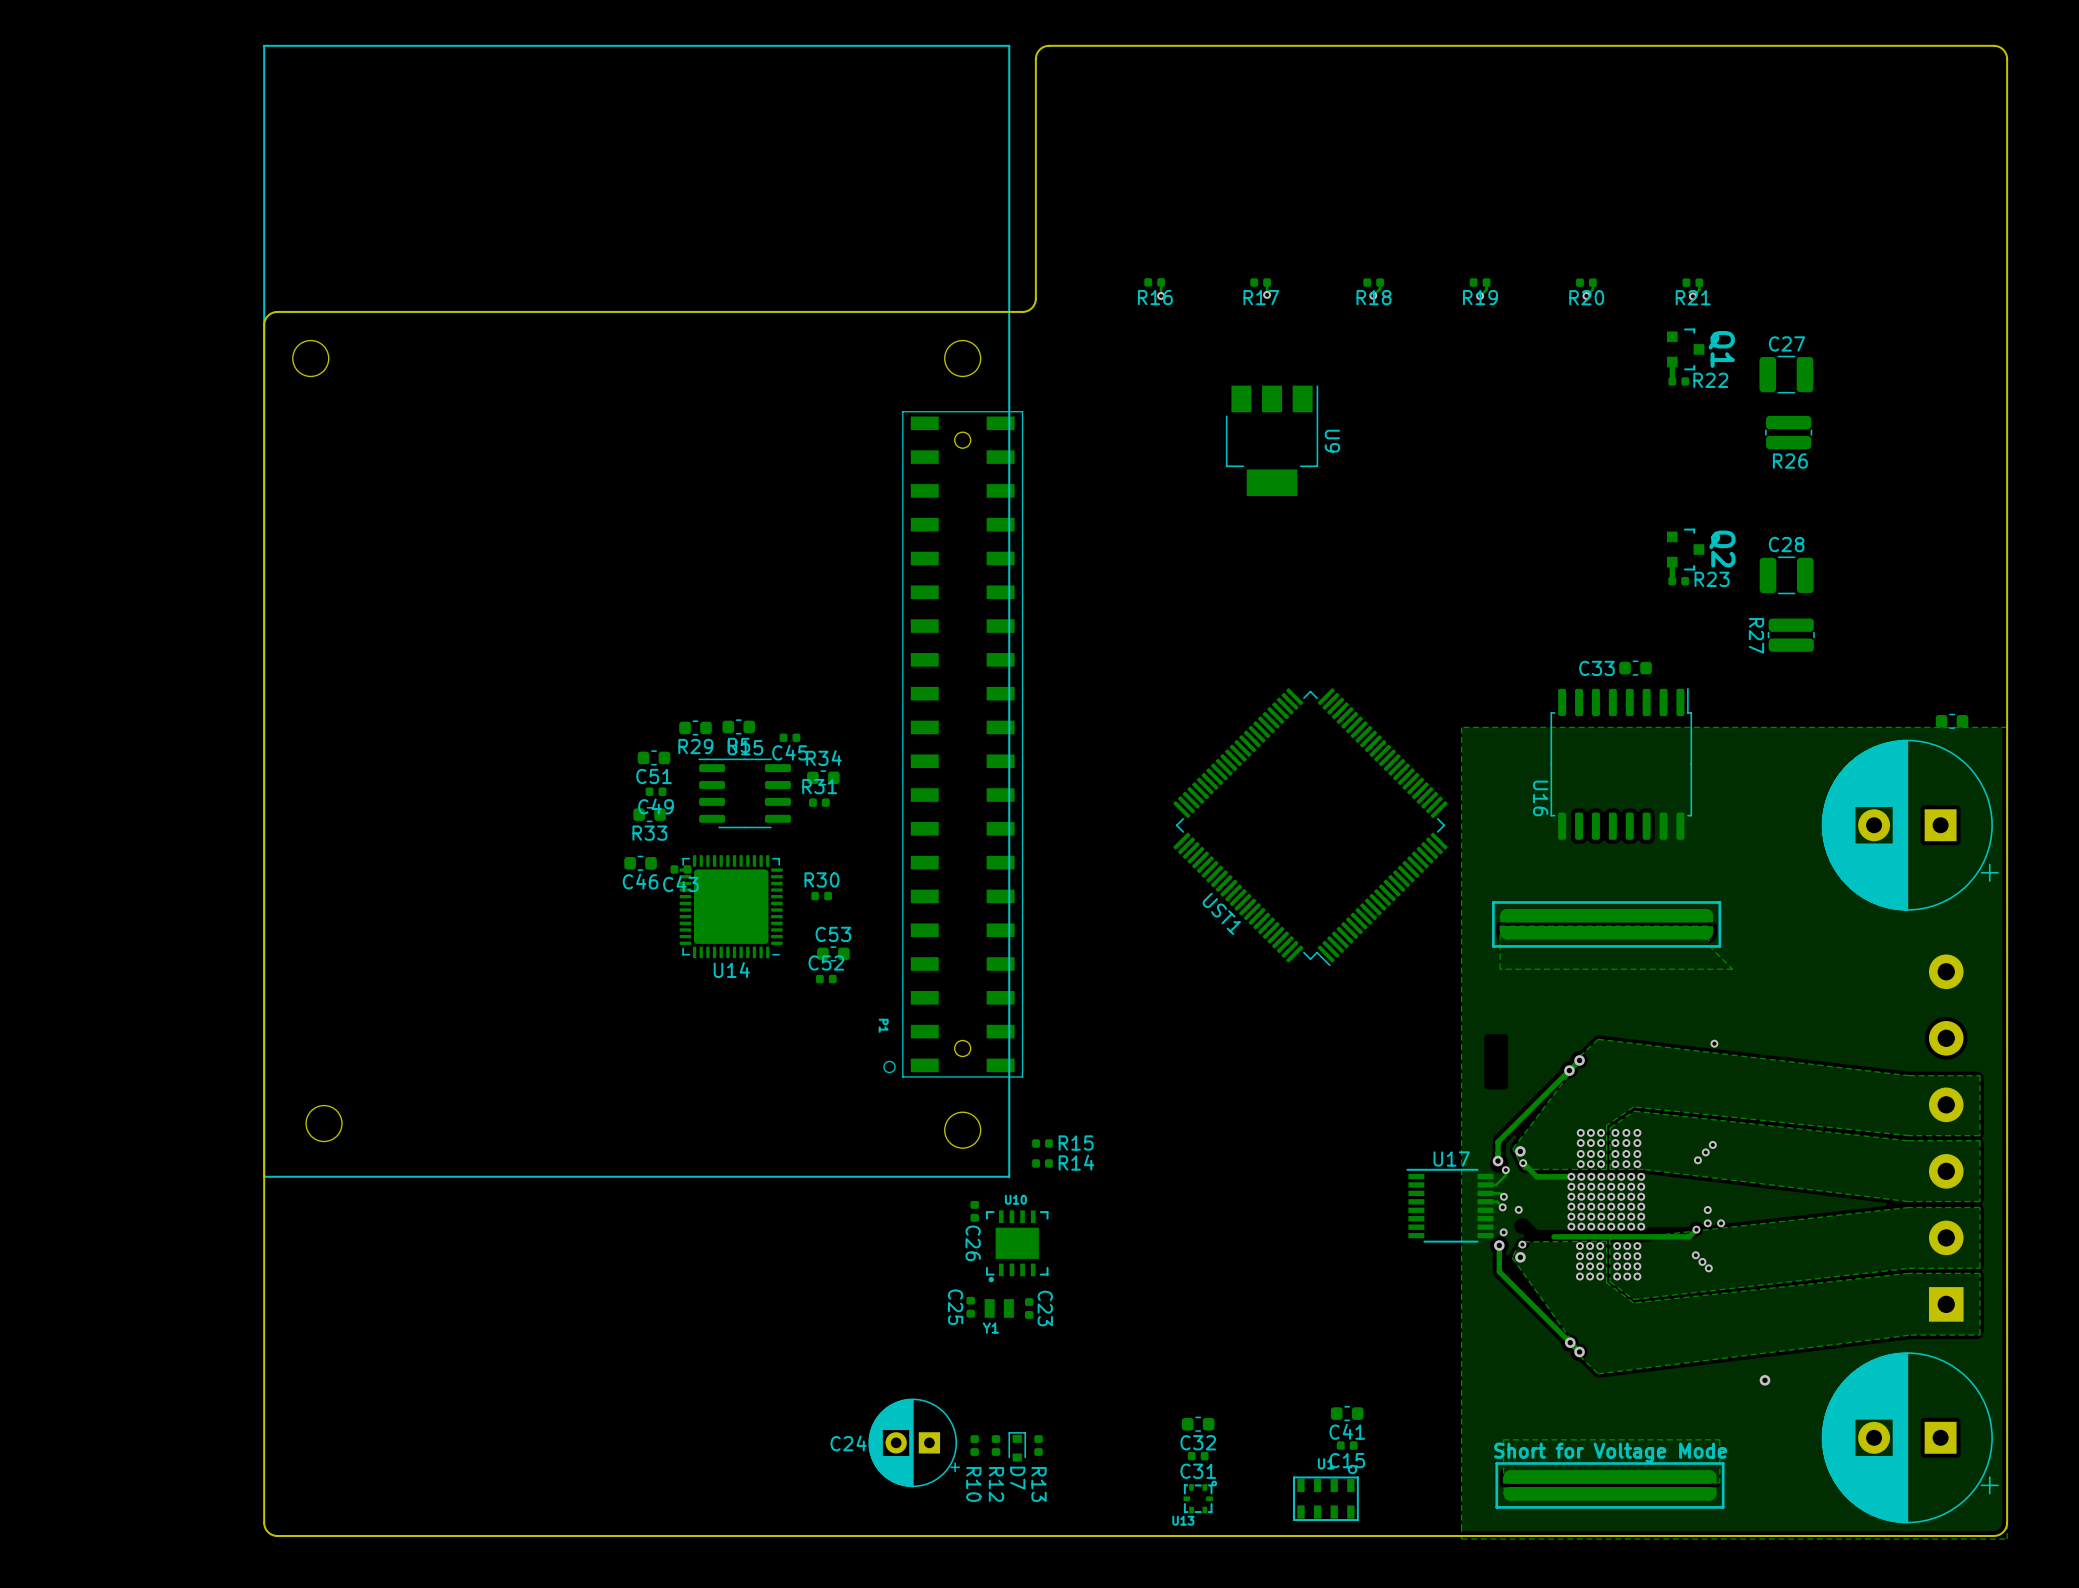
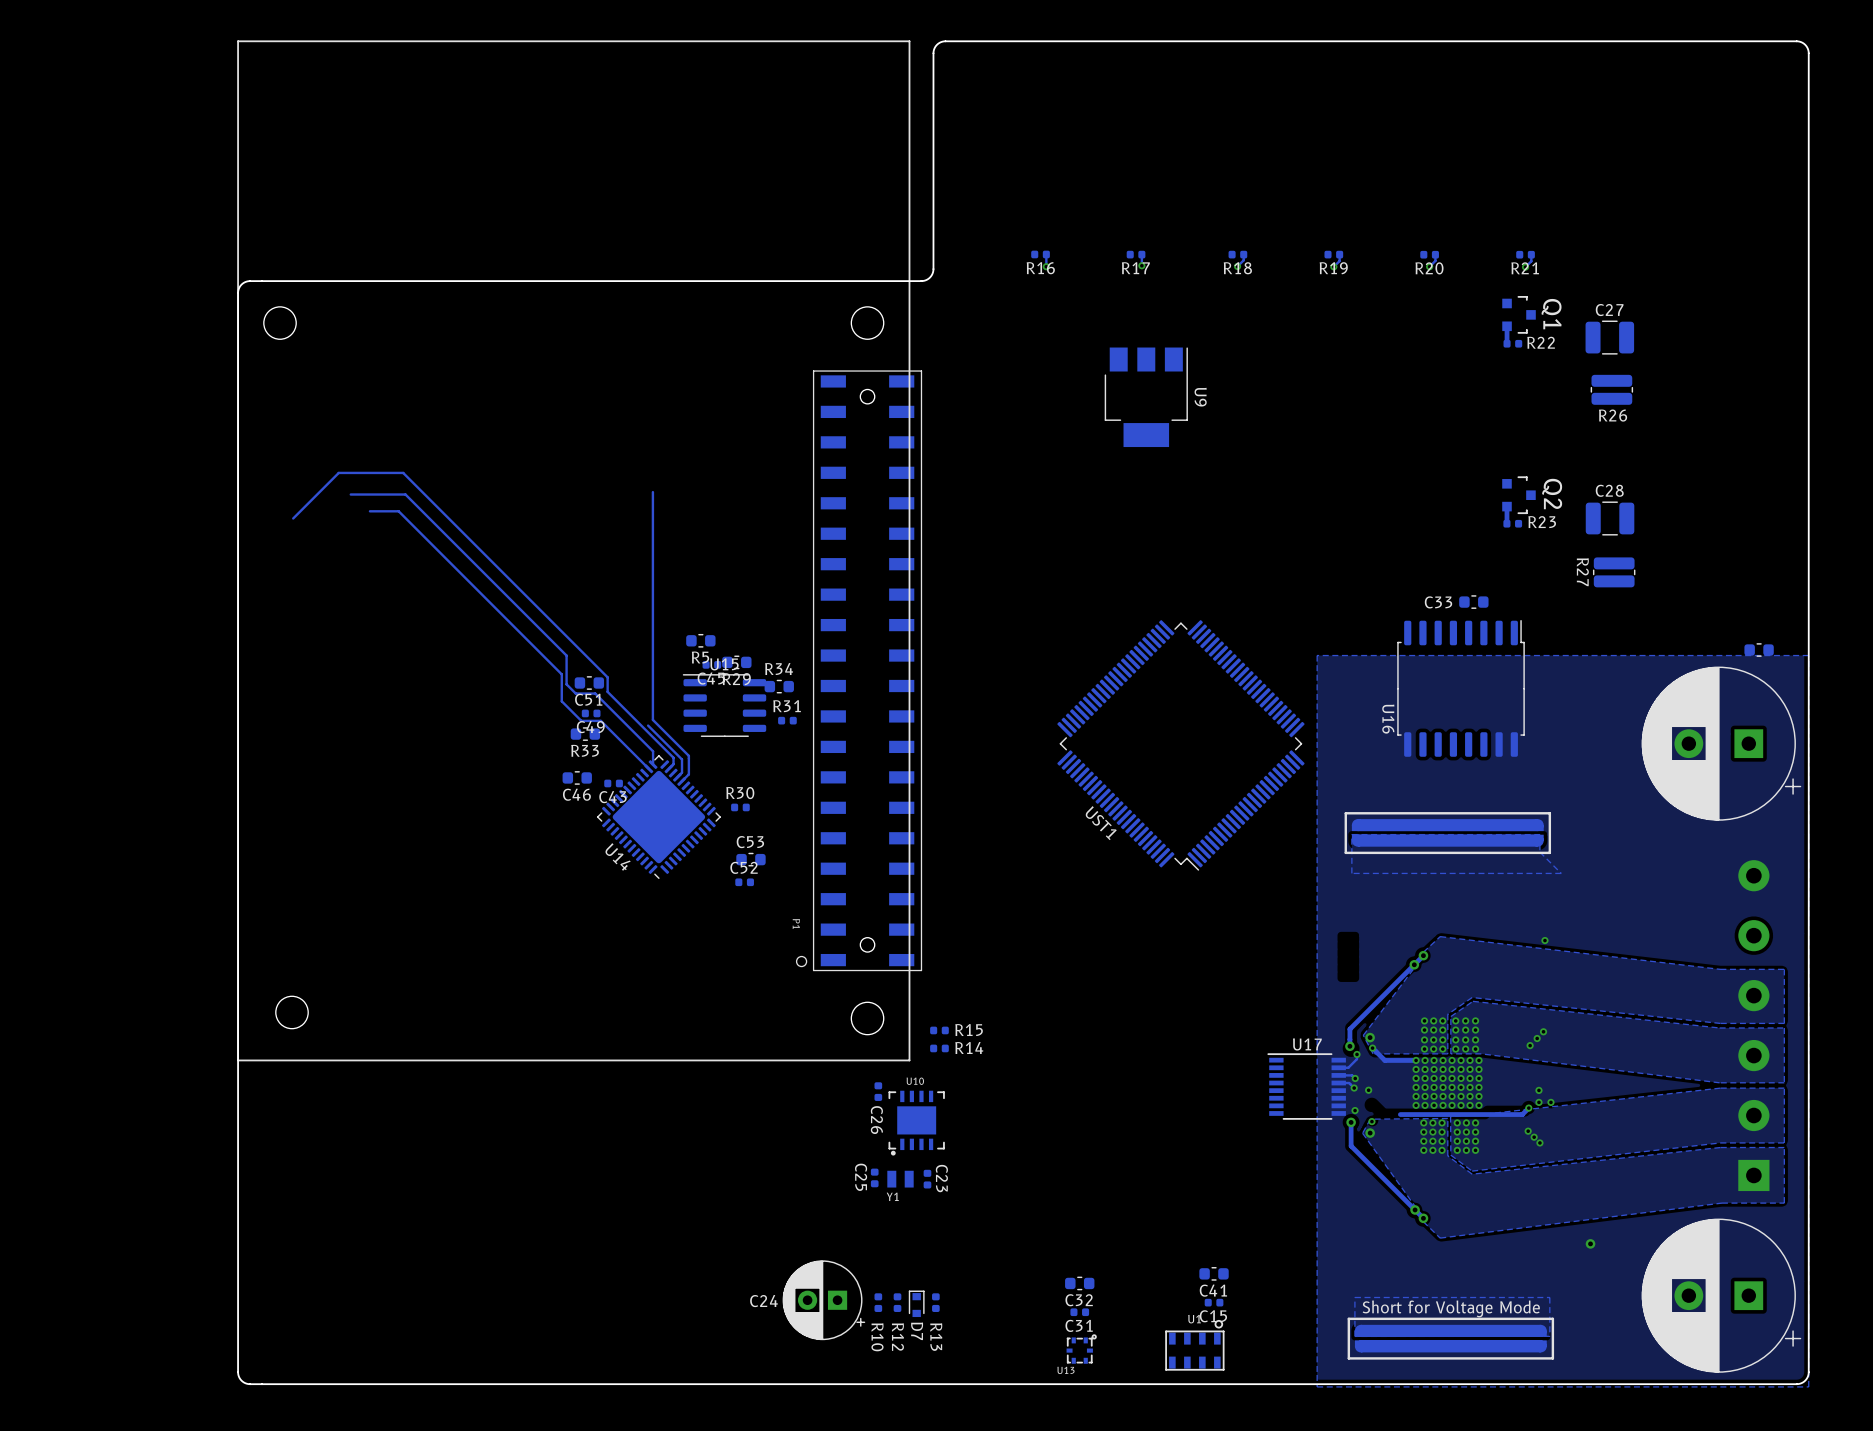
track: none -> (652, 492) (652, 719) (688, 755) (688, 774) (681, 781)
track: none -> (350, 494) (405, 494) (566, 655) (566, 684) (575, 693) (595, 693) (653, 751) (653, 764)
track: none -> (369, 511) (398, 511) (561, 674) (561, 701) (581, 720) (600, 720) (648, 768)
track: none -> (293, 518) (338, 472) (403, 472) (607, 677) (607, 691) (673, 757) (673, 764) (668, 768)
R5 position: (738, 726) -> (700, 640)
R29 position: (695, 727) -> (736, 662)
R34 position: (823, 777) -> (779, 686)
U15 position: (744, 793) -> (724, 705)
R31 position: (819, 802) -> (787, 720)
track: none -> (648, 725) (682, 759) (682, 772) (677, 777)
U14 rotation: 0° (731, 906) -> 45° clockwise (658, 817)

